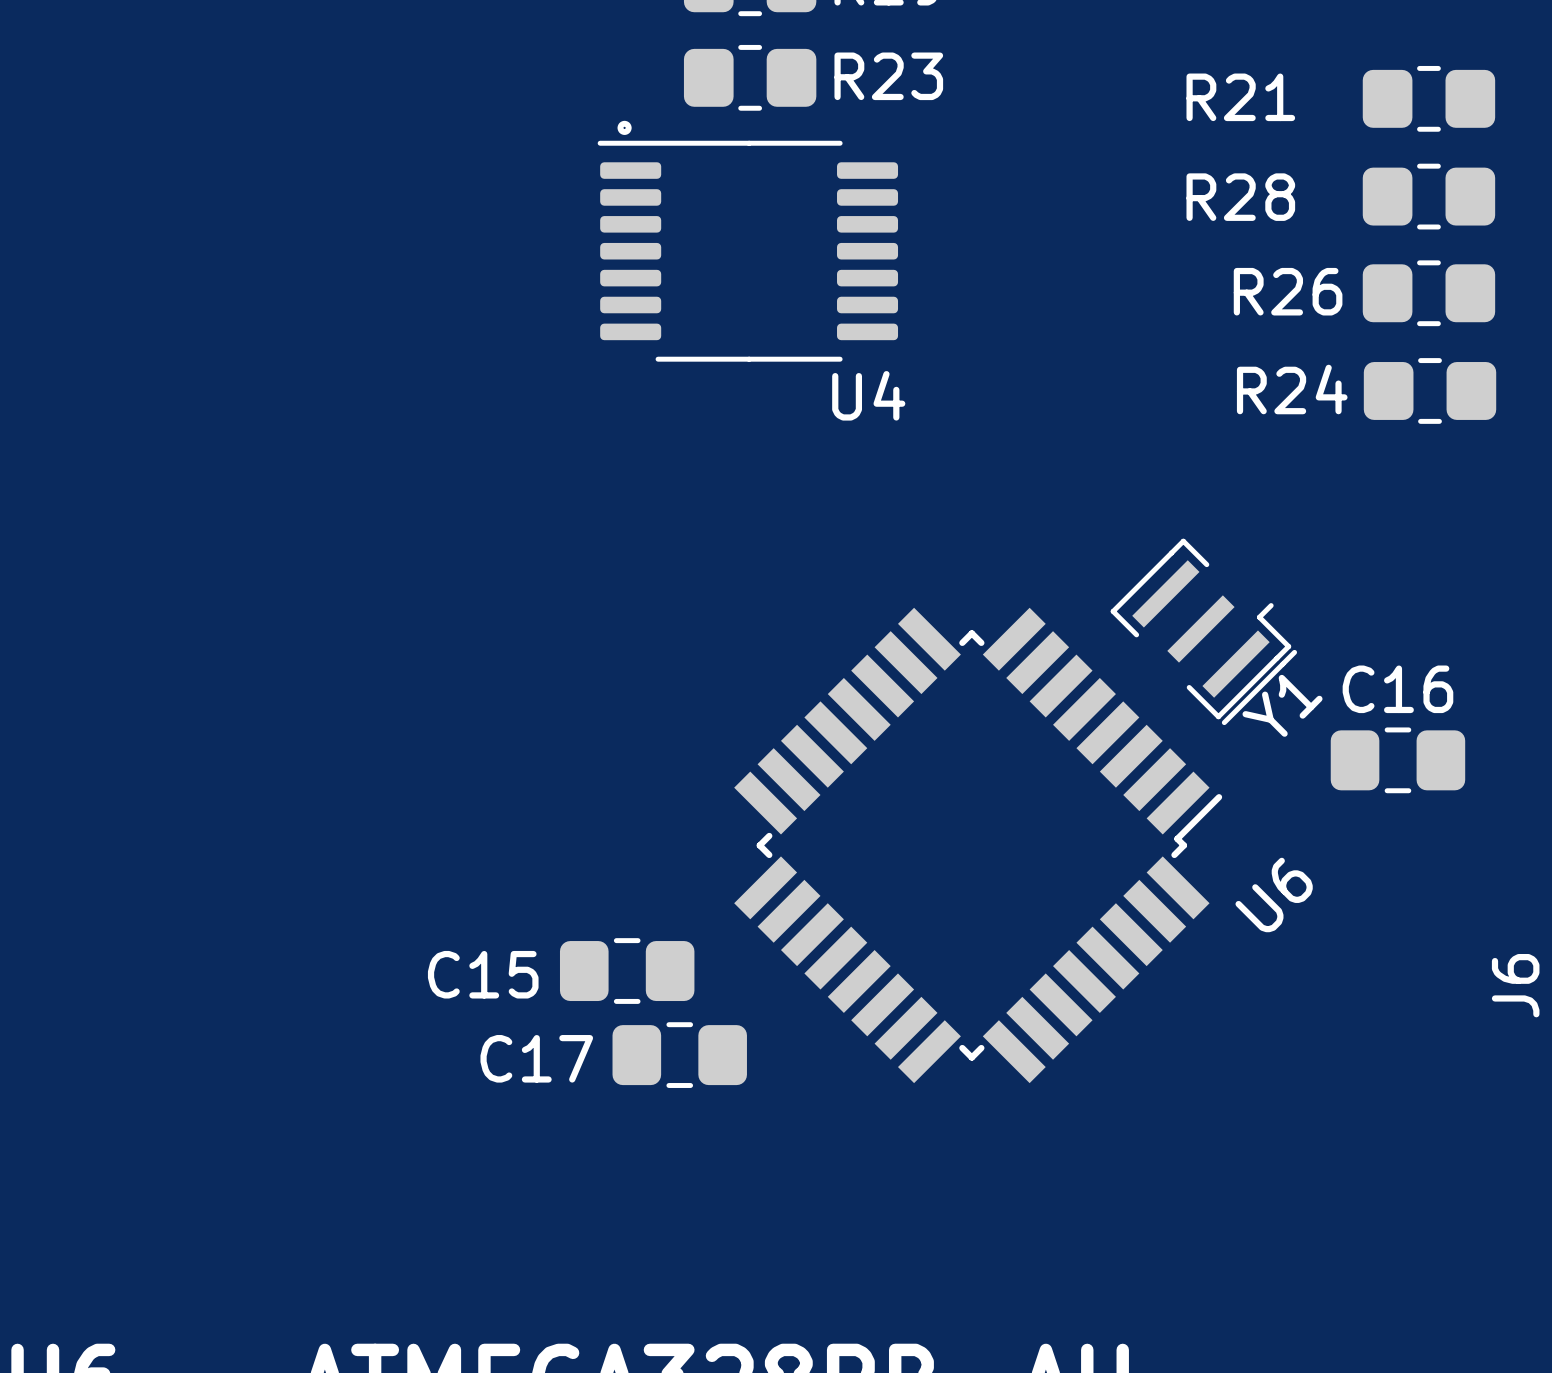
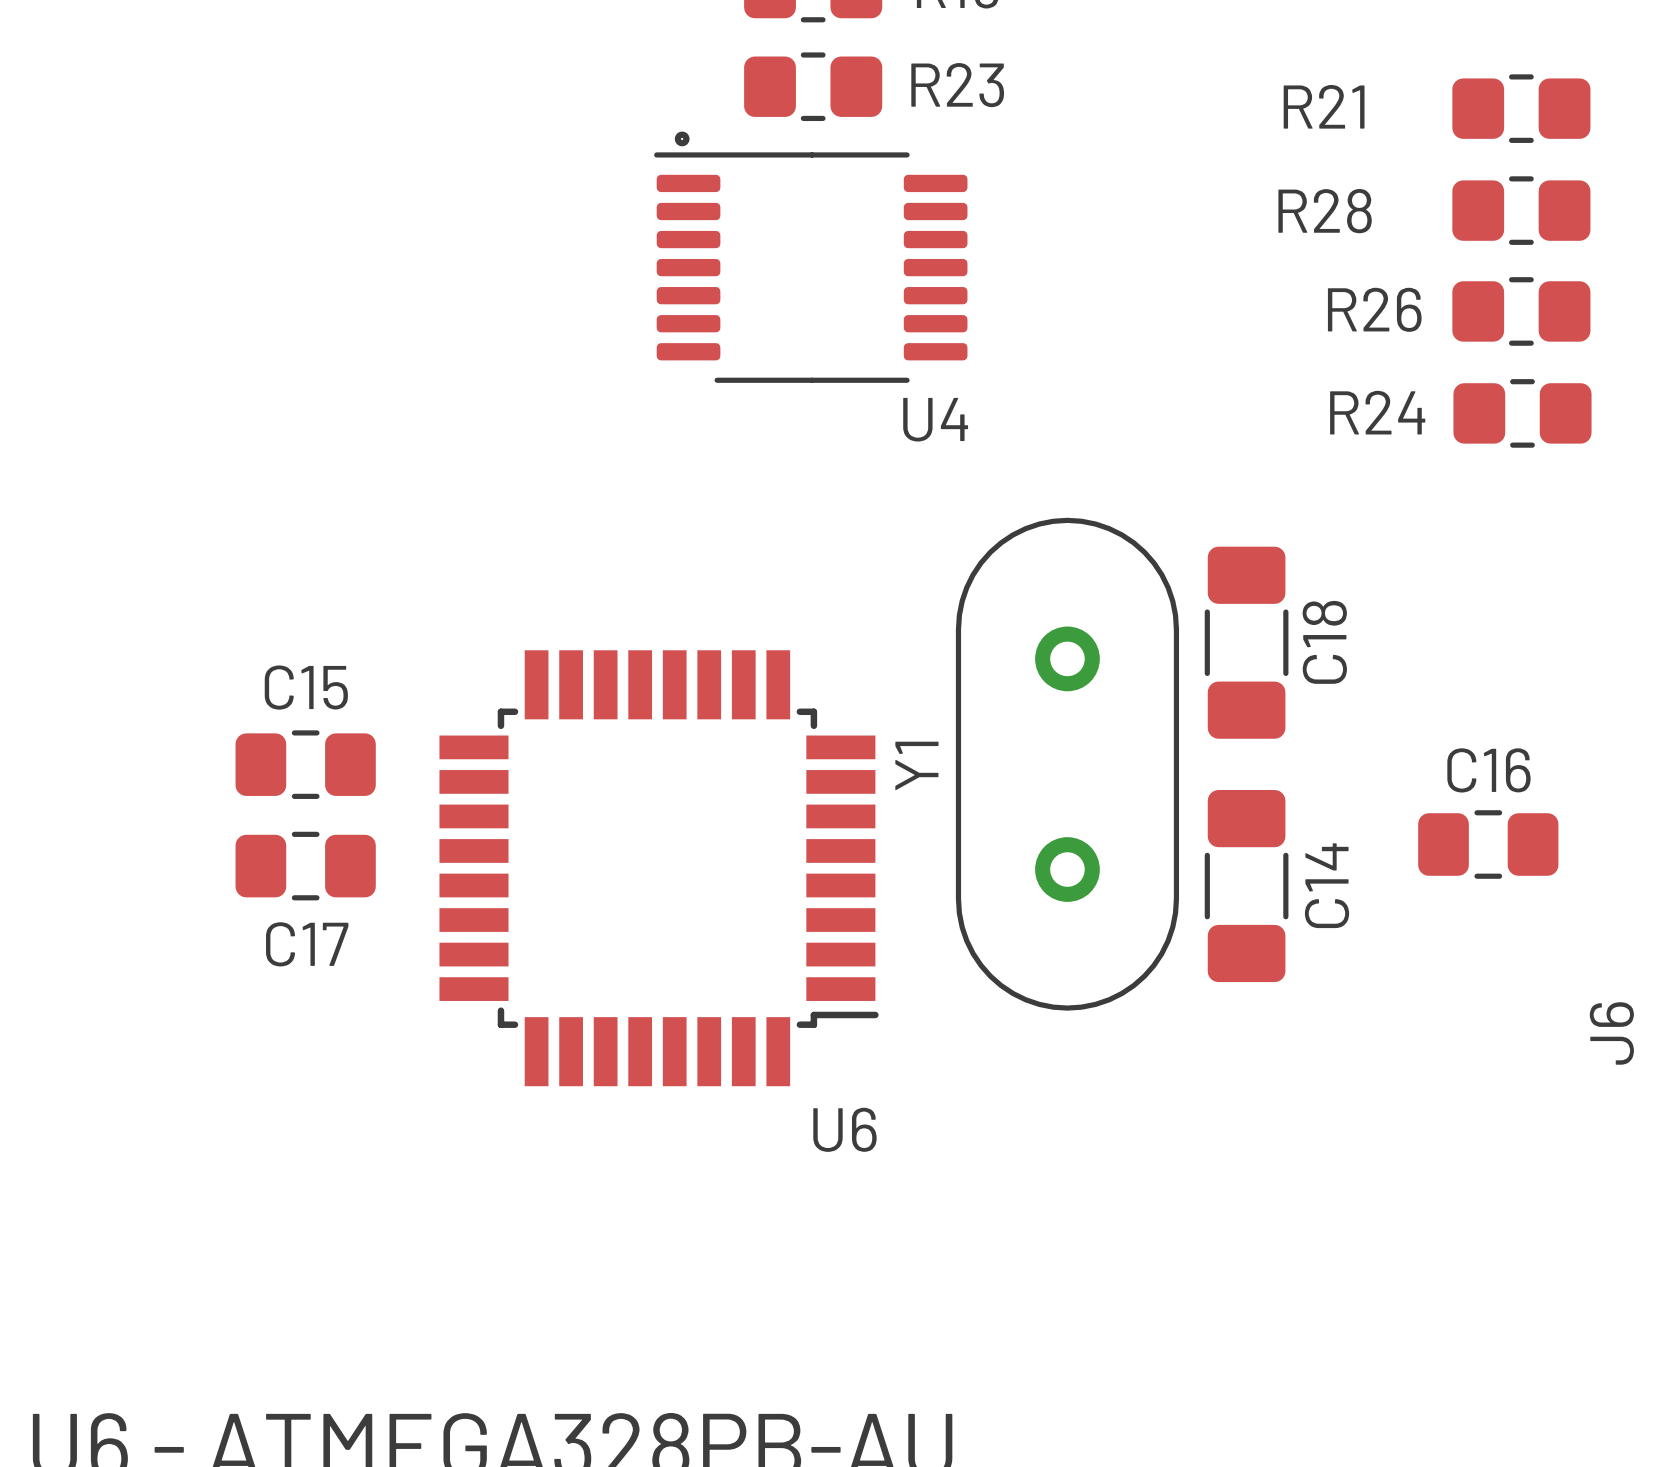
Y1 footprint: [1110, 538, 1298, 726] -> [955, 517, 1180, 1011]
C18: none -> (1246, 642)
Y1 name position: Y1 (1282, 705) -> Y1 (916, 765)
C16 position: (1397, 760) -> (1488, 844)
C14: none -> (1246, 886)
U6 rotation: 0° (978, 845) -> 45° clockwise (659, 868)
U6 position: (978, 845) -> (659, 868)
C15 position: (627, 971) -> (305, 764)
C15 name position: C15 (483, 974) -> C15 (306, 687)
C17 position: (679, 1055) -> (305, 866)
C17 name position: C17 (536, 1058) -> C17 (307, 944)

